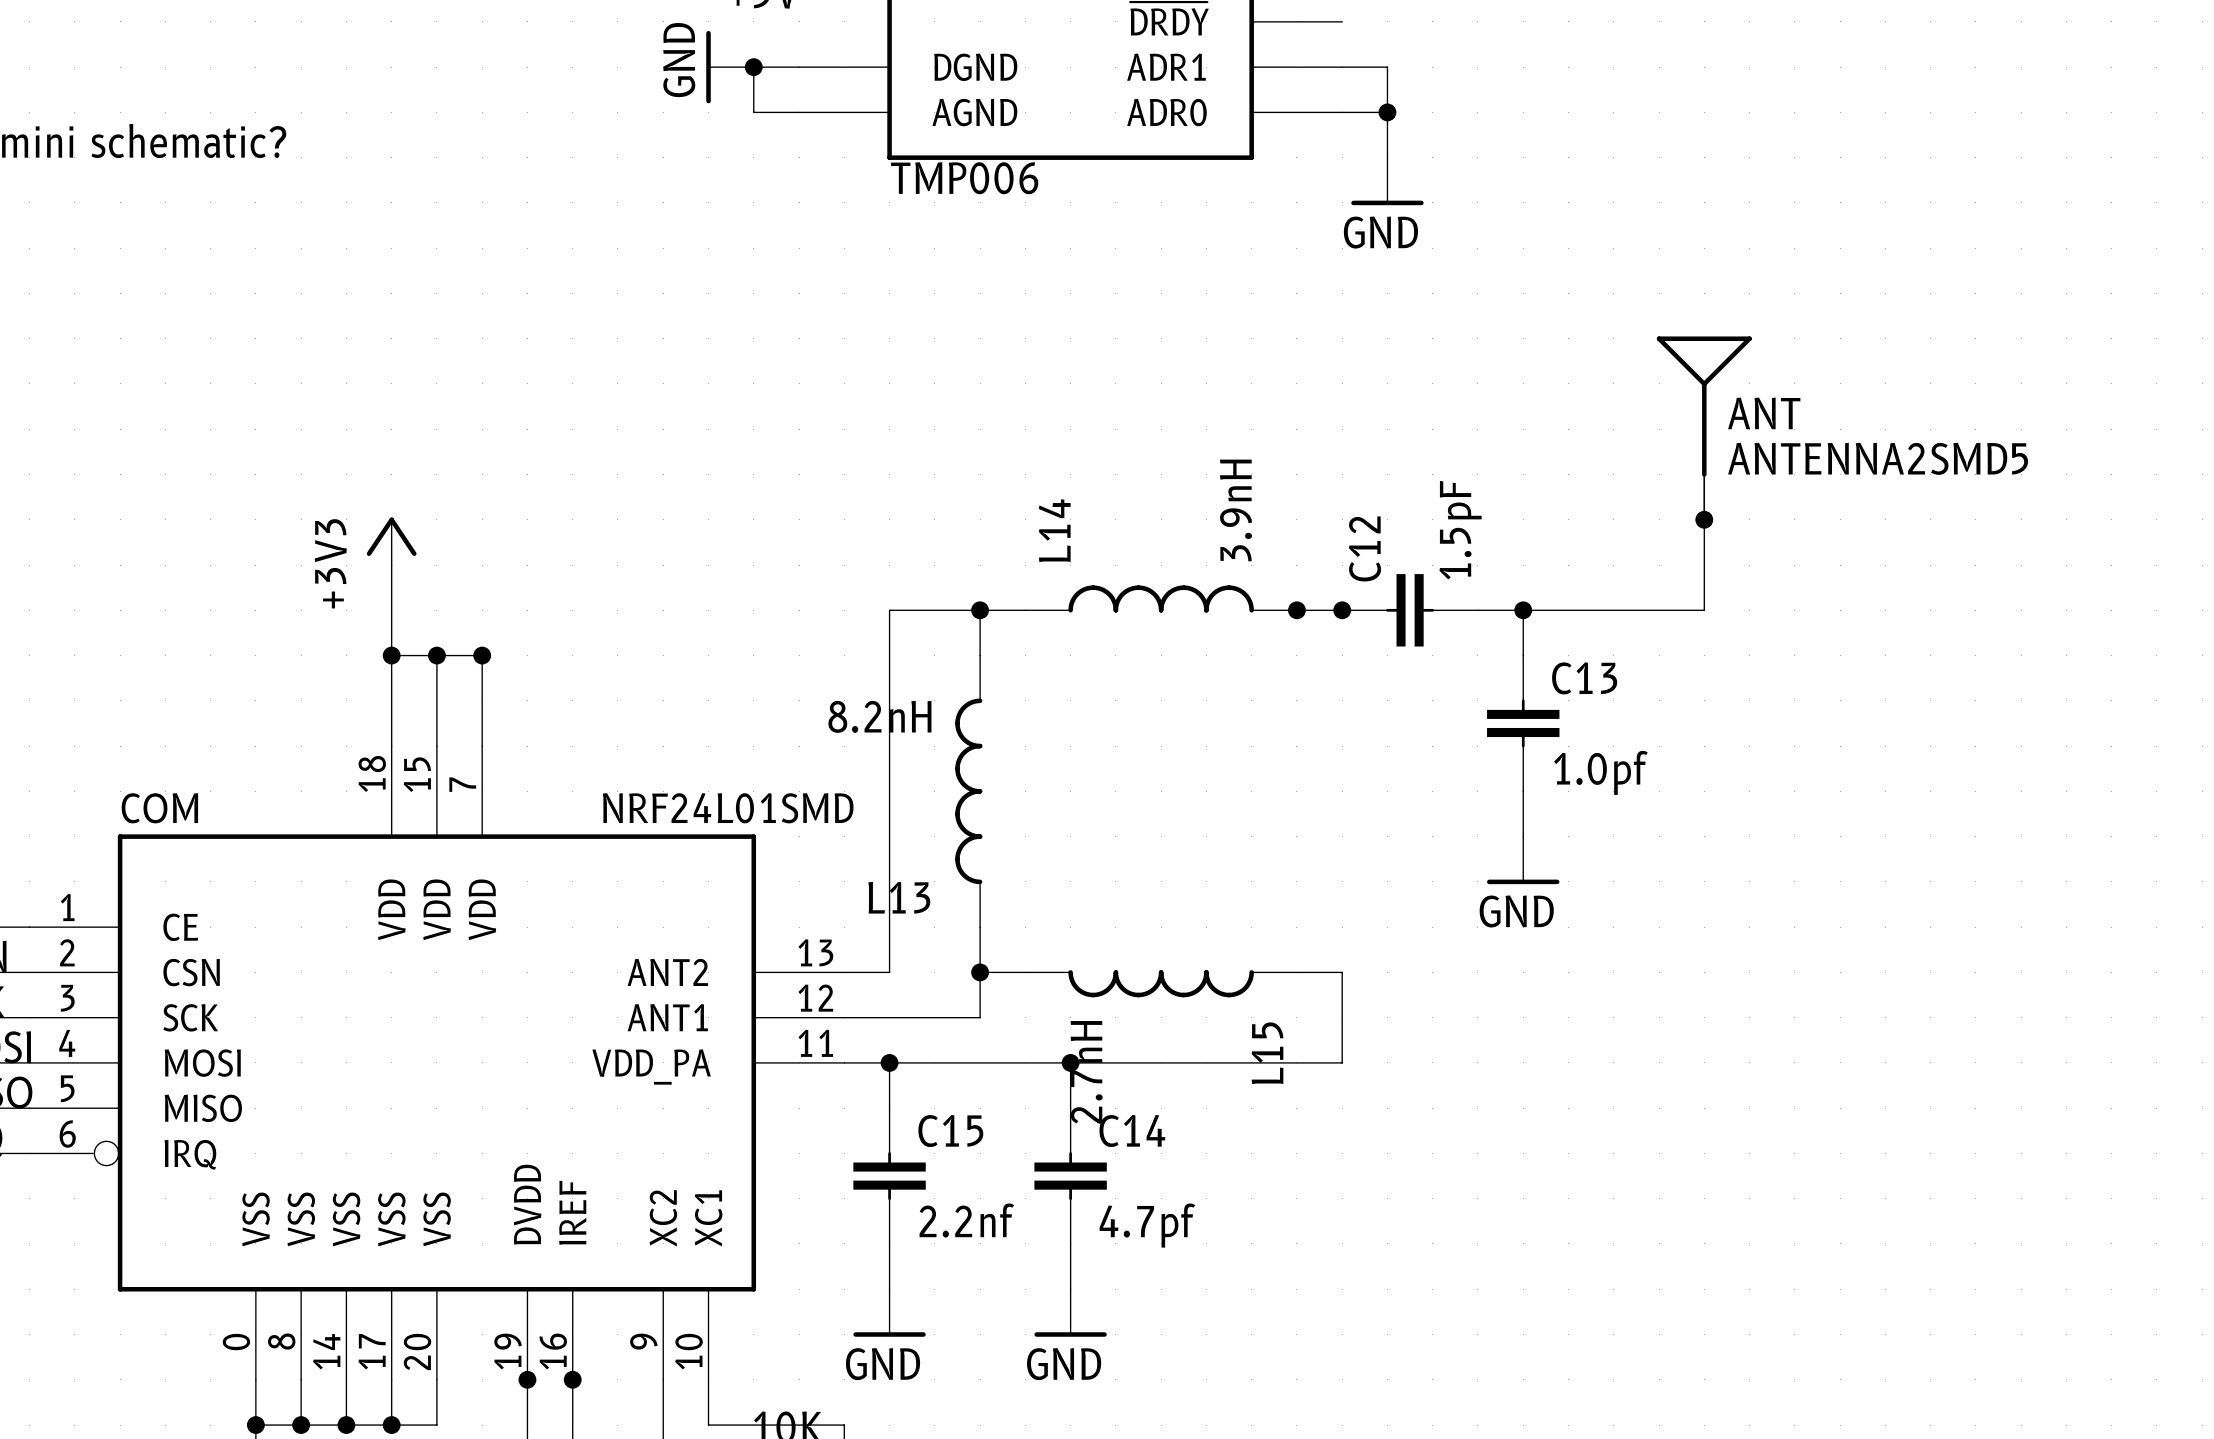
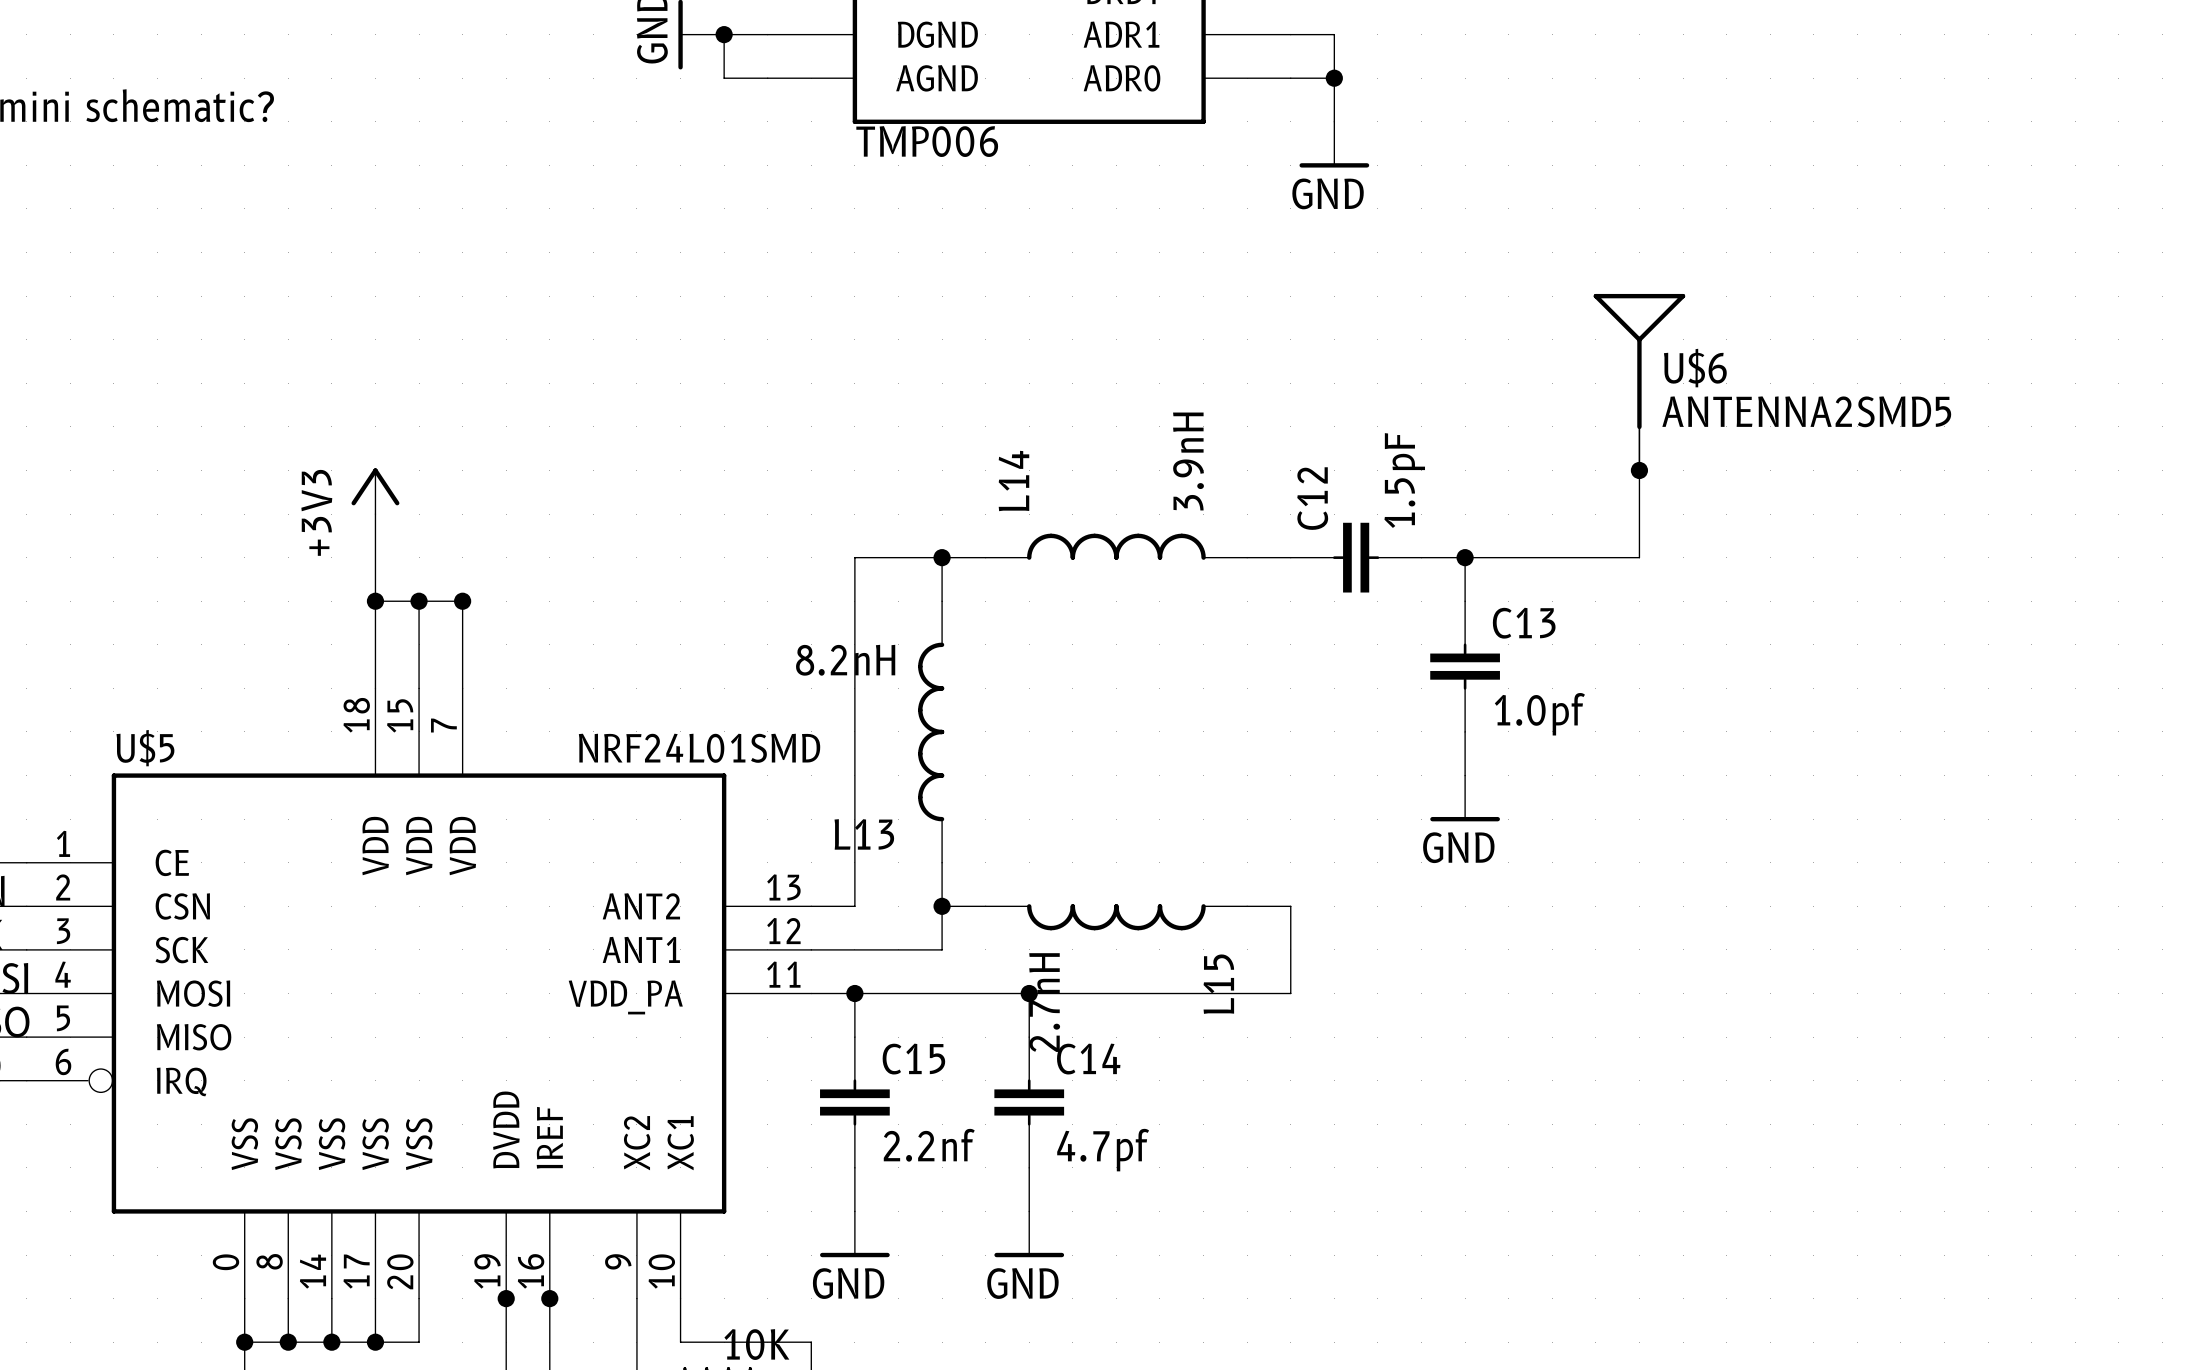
ANT name: ANT (1764, 413) -> U$6 (1695, 368)
junction: (1296, 610) -> none
junction: (1342, 610) -> none
COM name: COM (159, 808) -> U$5 (145, 748)

